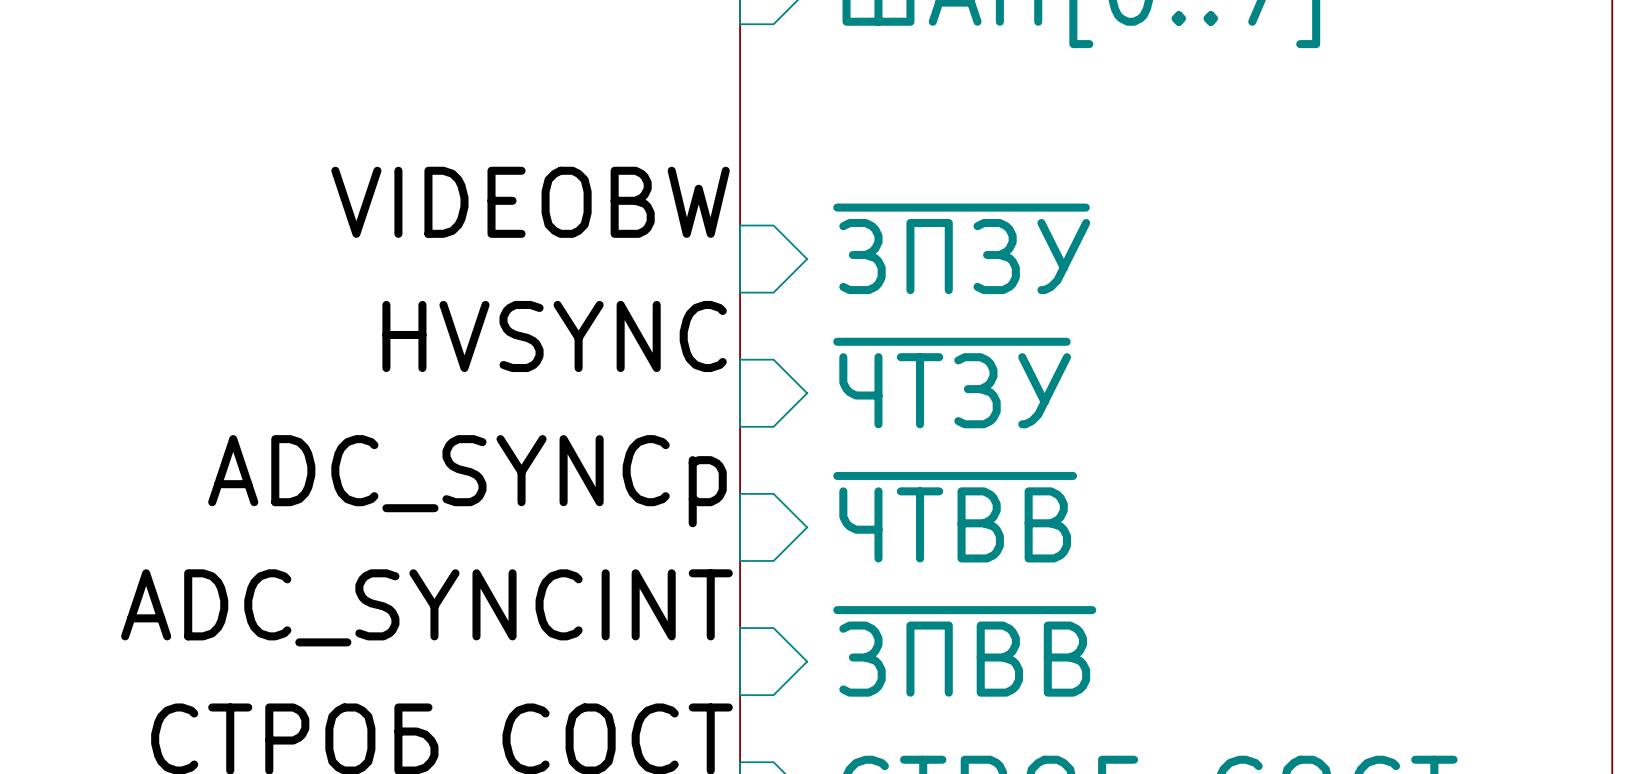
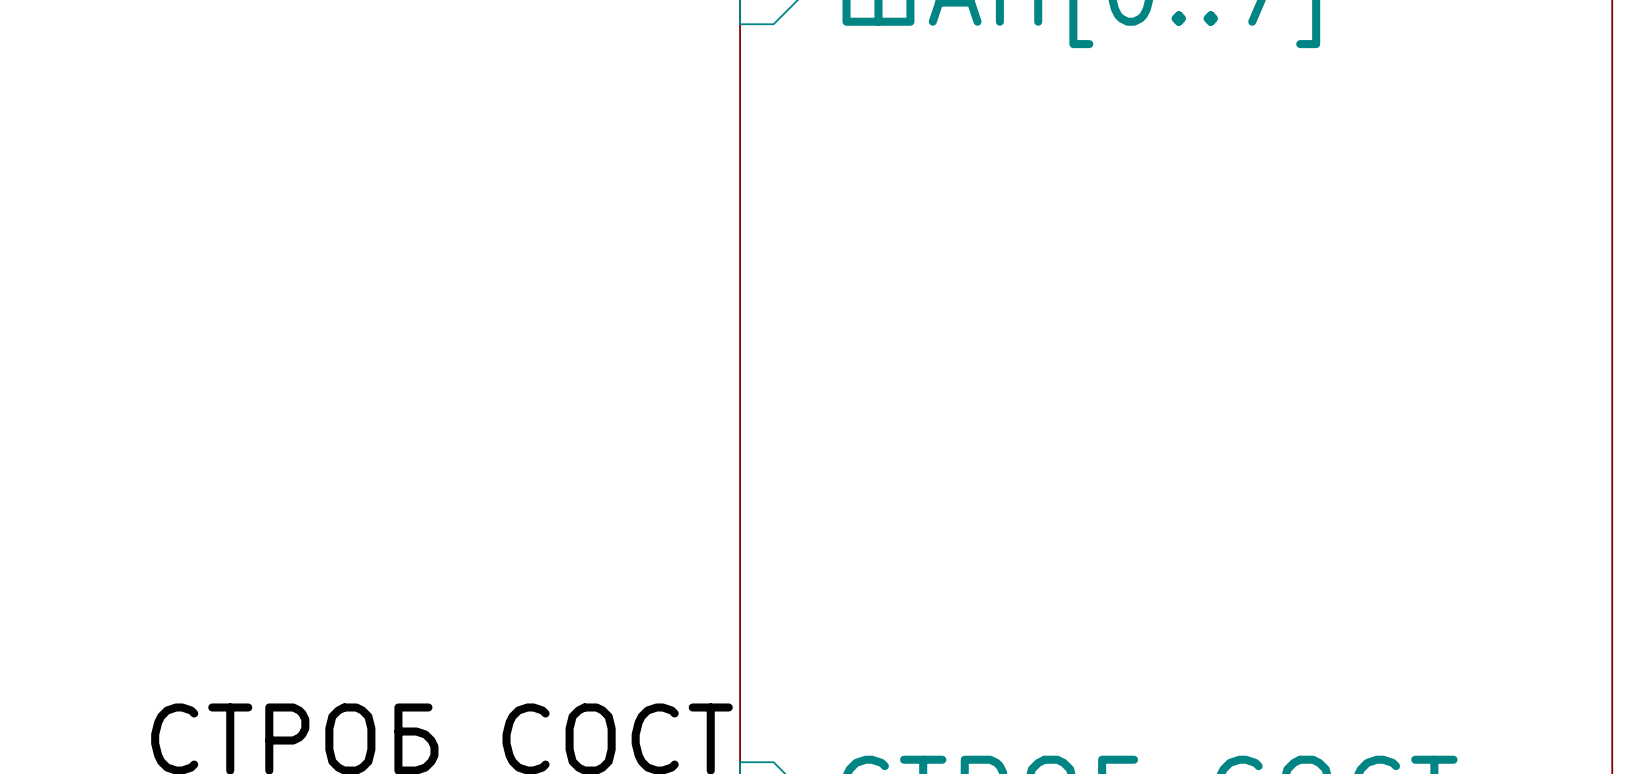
label: VIDEOBW (530, 202) -> none
sheet pin: ~{ЗПЗУ} (961, 248) -> none
label: HVSYNC (554, 336) -> none
sheet pin: ~{ЧТЗУ} (952, 383) -> none
label: ADC_SYNCp (467, 481) -> none
sheet pin: ~{ЧТВВ} (955, 517) -> none
label: ADC_SYNCINT (426, 607) -> none
sheet pin: ~{ЗПВВ} (964, 651) -> none

